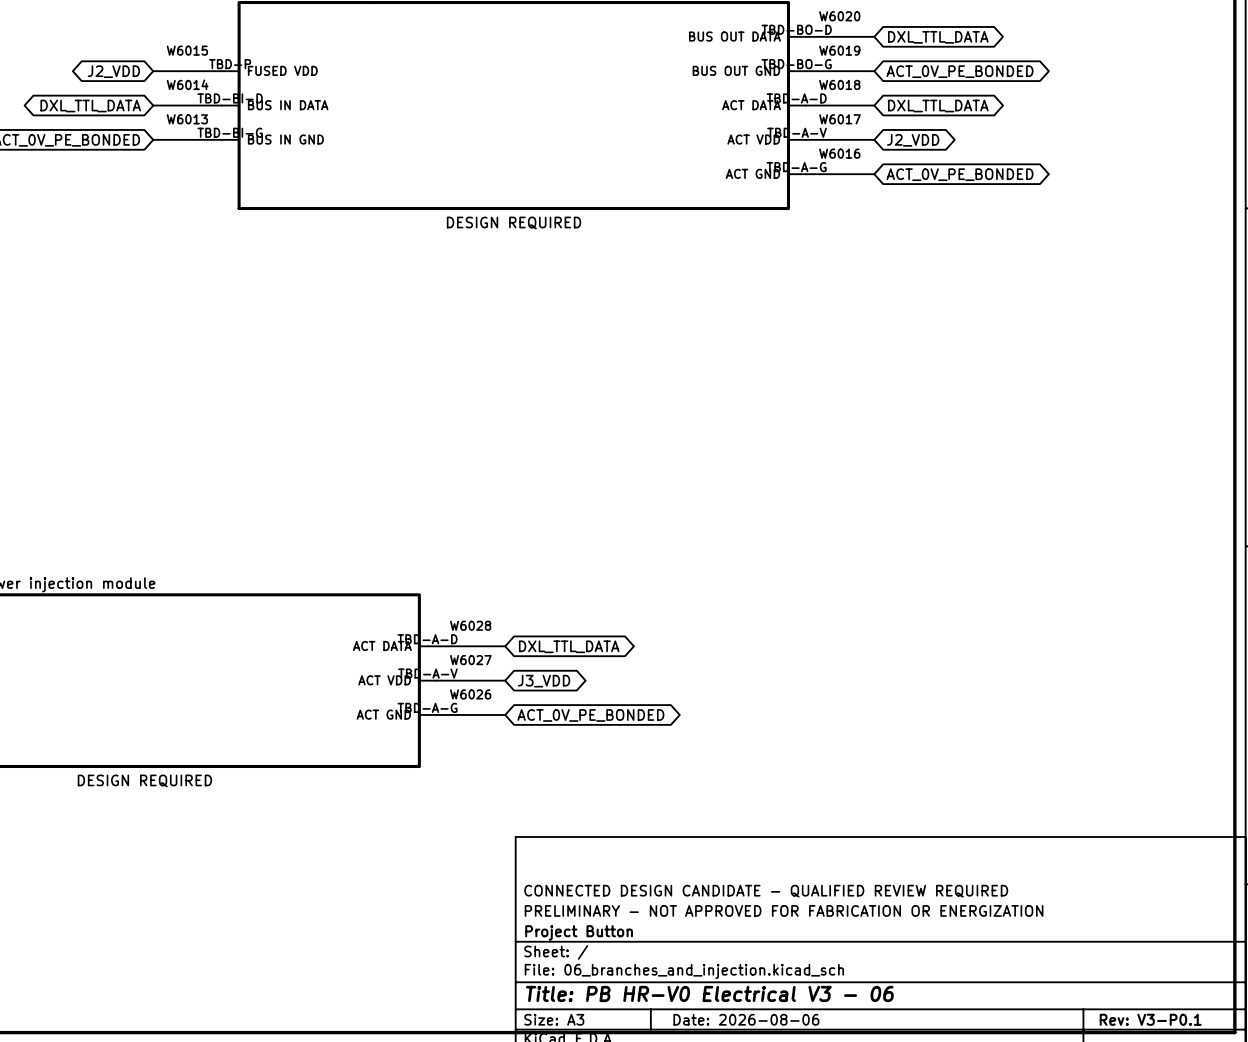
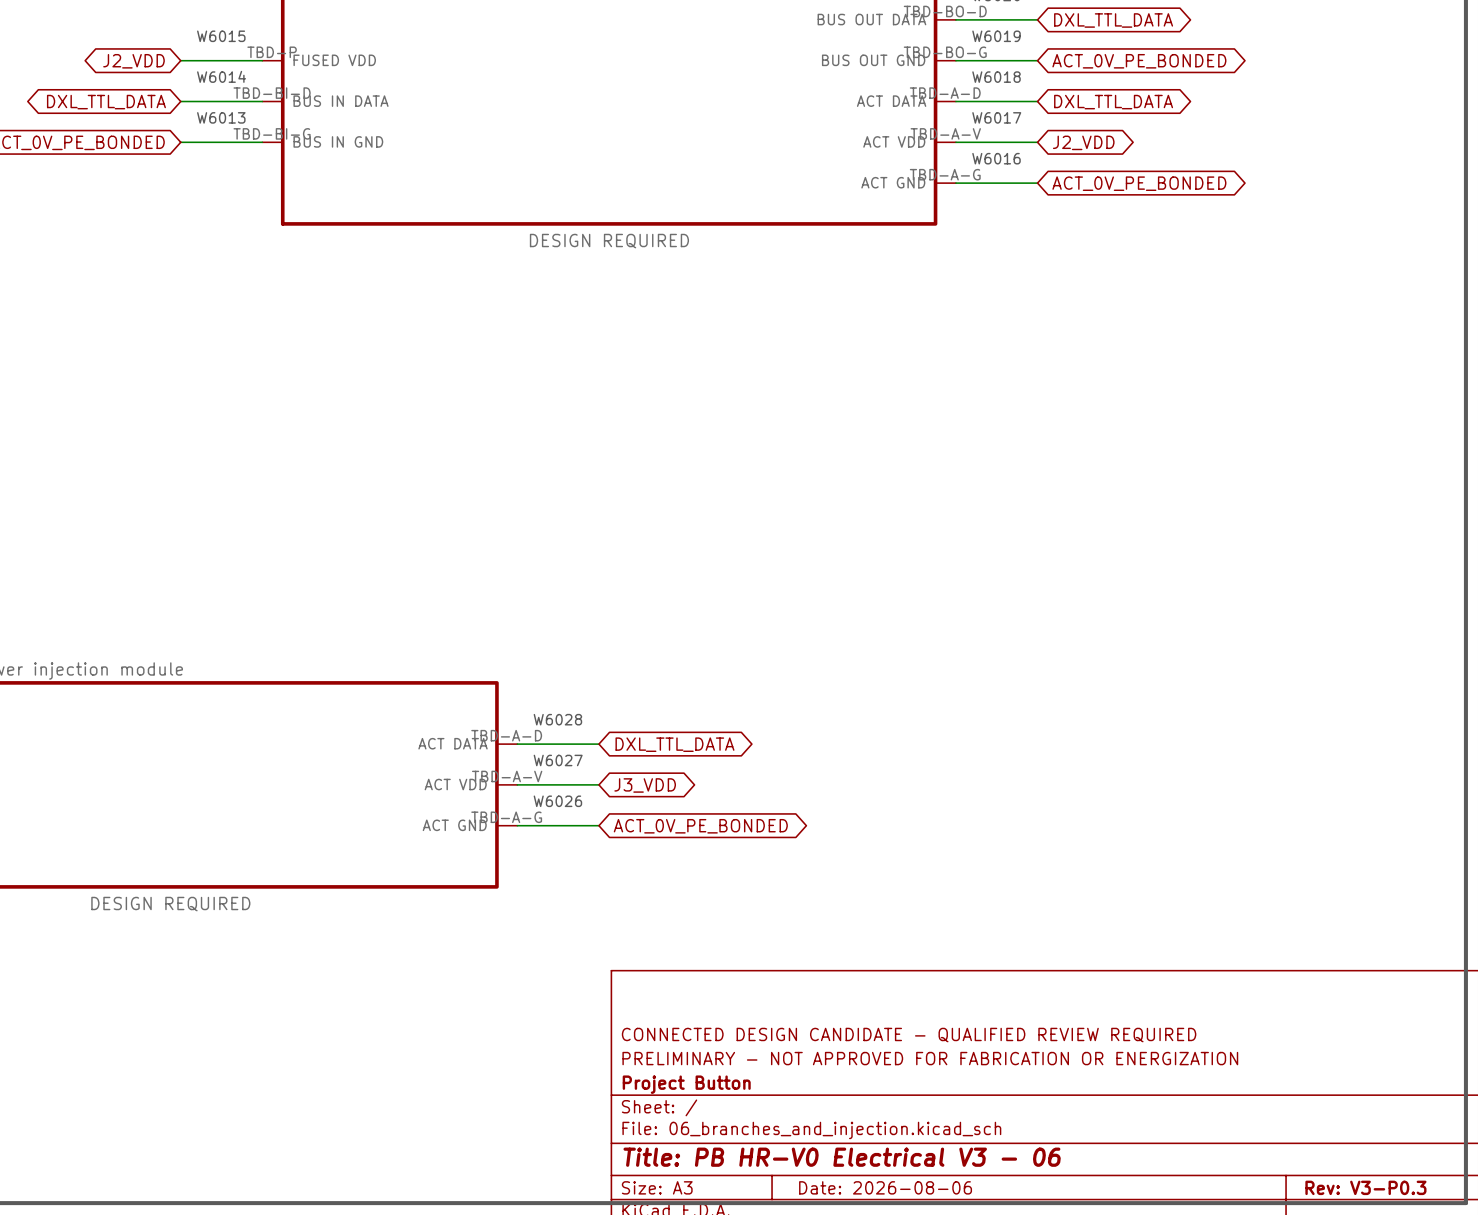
title block: Rev: V3-P0.1 (1150, 1019) -> Rev: V3-P0.3 (1365, 1187)

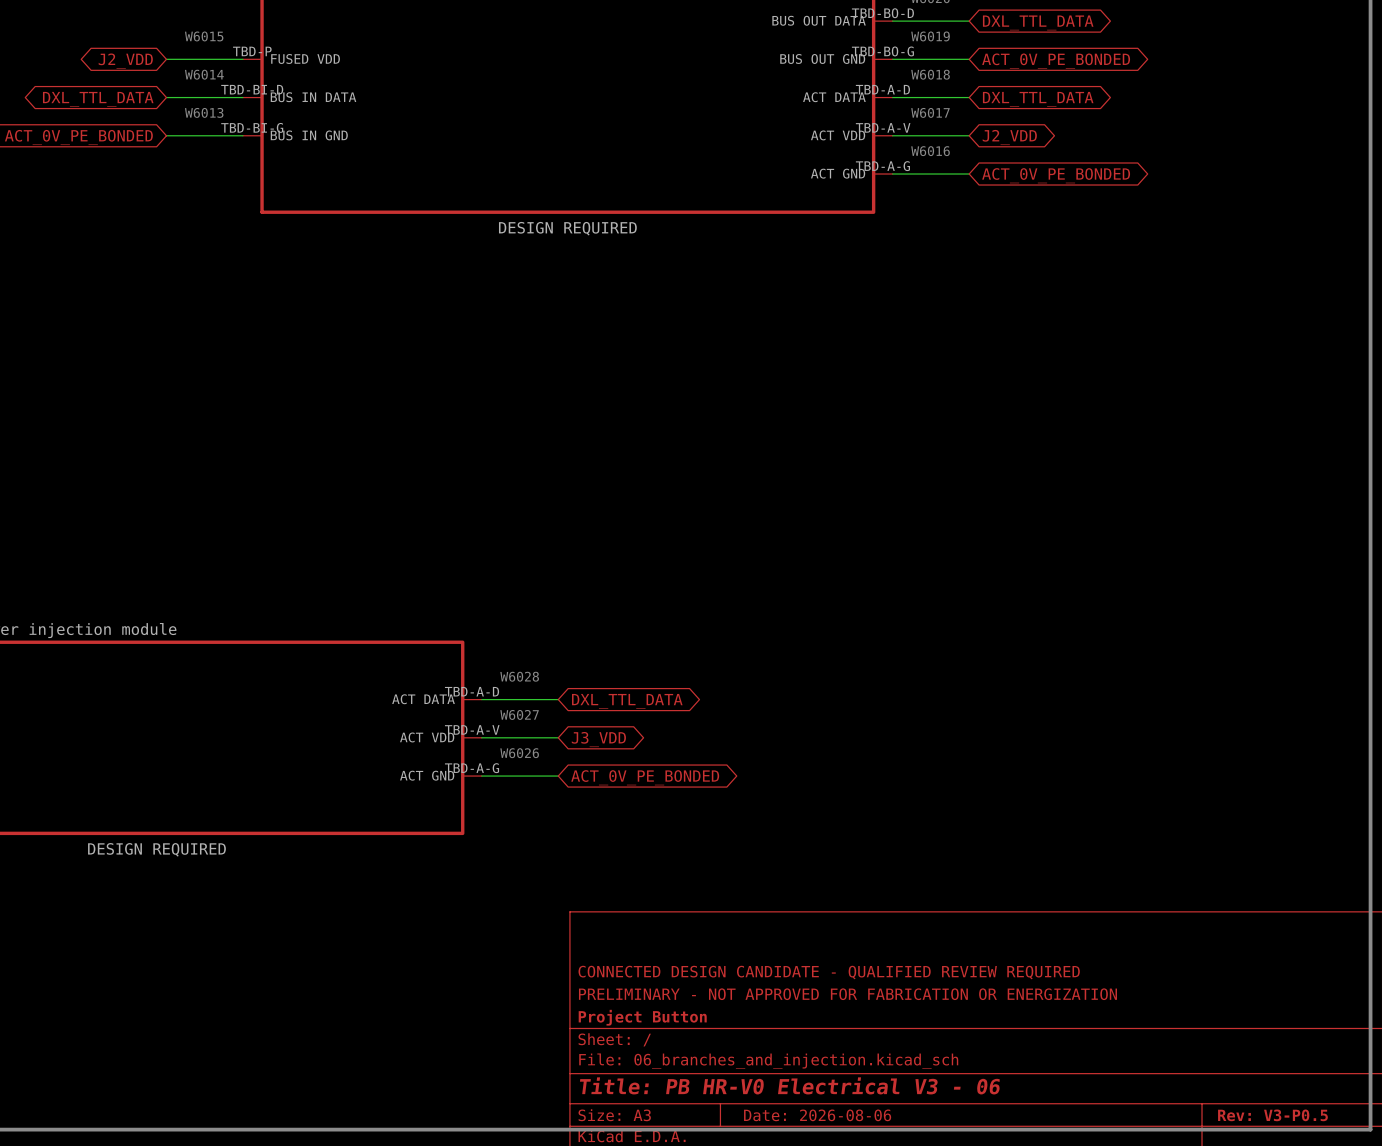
title block: Rev: V3-P0.3 (1365, 1187) -> Rev: V3-P0.5 (1272, 1115)

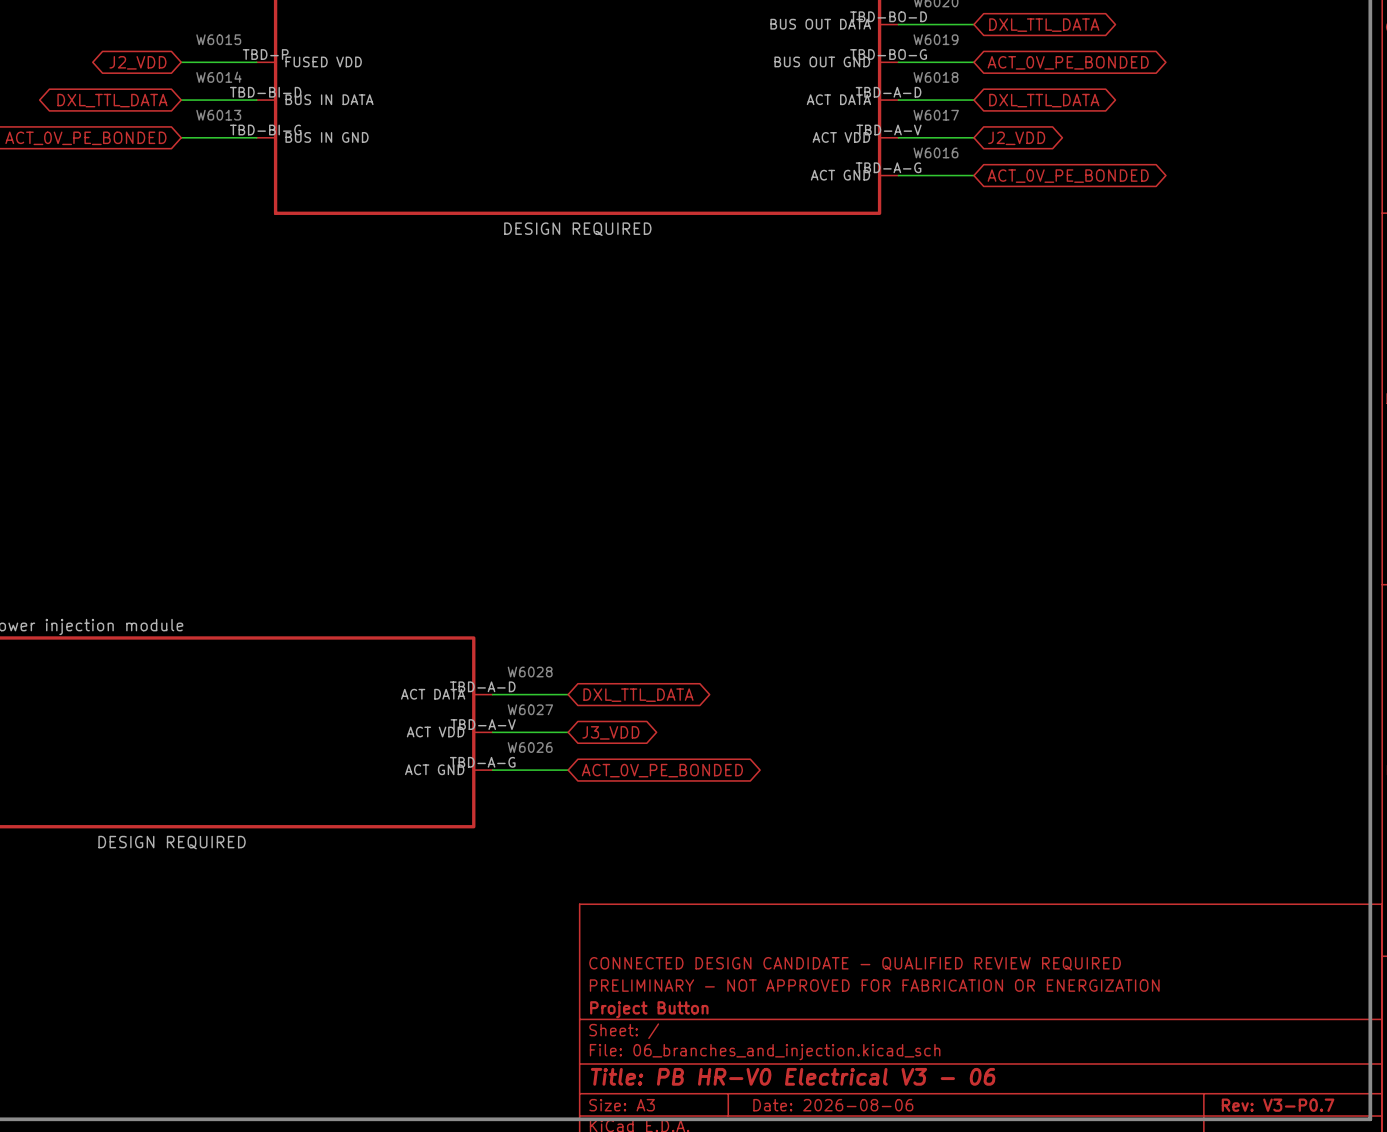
title block: Rev: V3-P0.5 (1272, 1115) -> Rev: V3-P0.7 (1278, 1105)

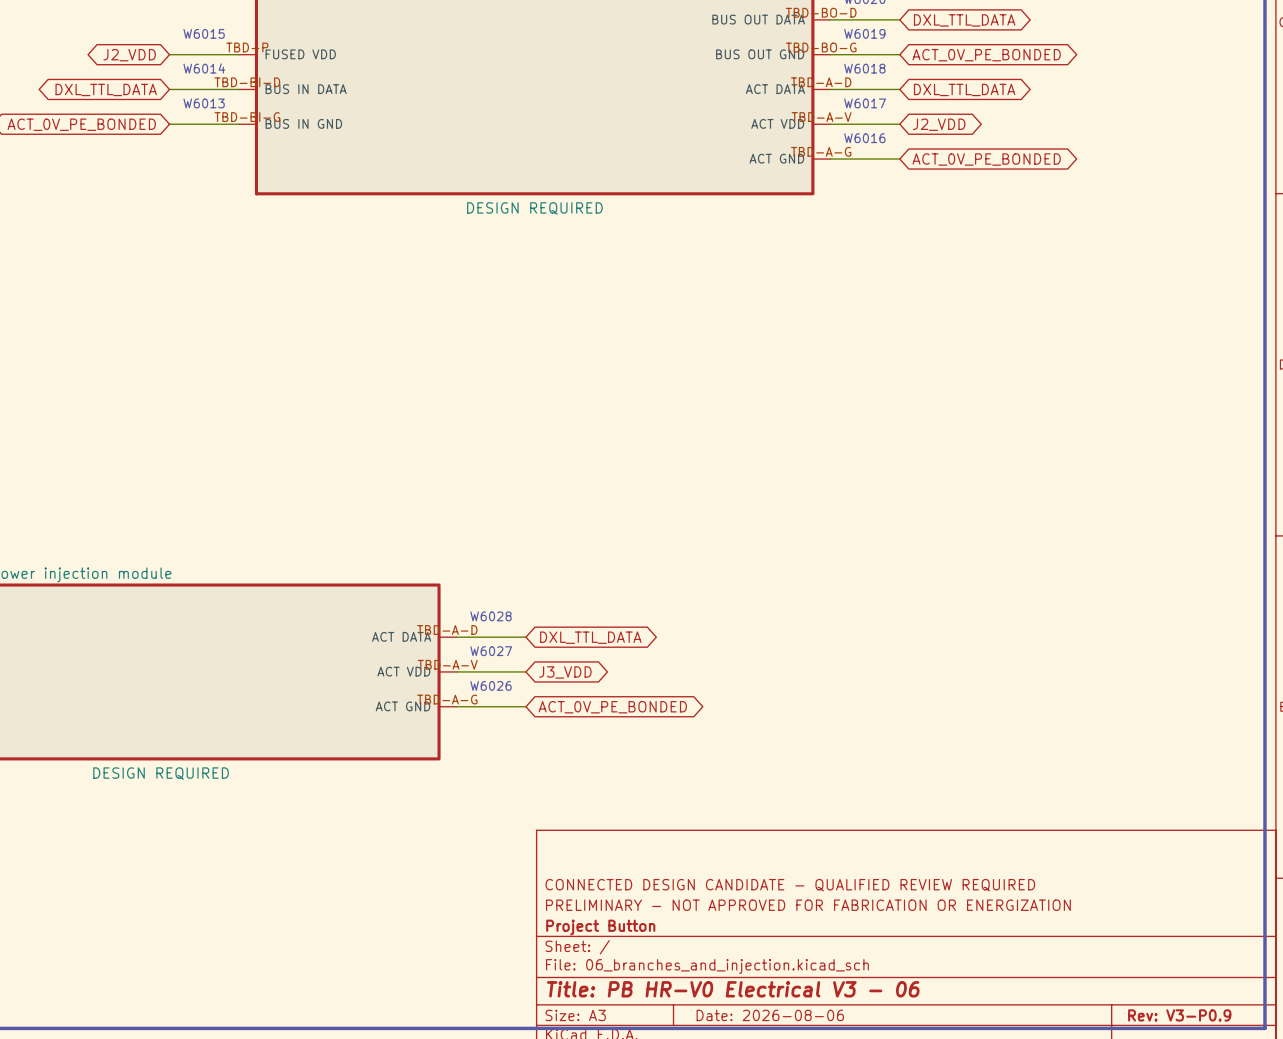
title block: Rev: V3-P0.7 (1278, 1105) -> Rev: V3-P0.9 (1179, 1015)

